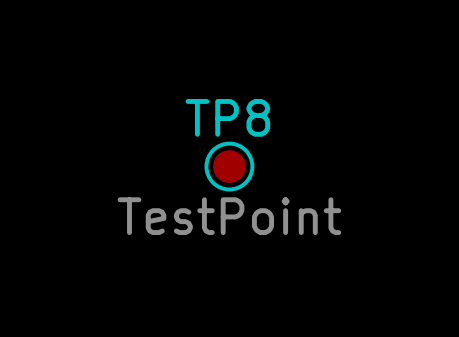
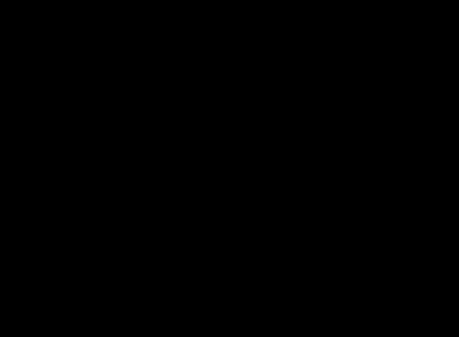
TP8: TestPoint (229, 166) -> none

